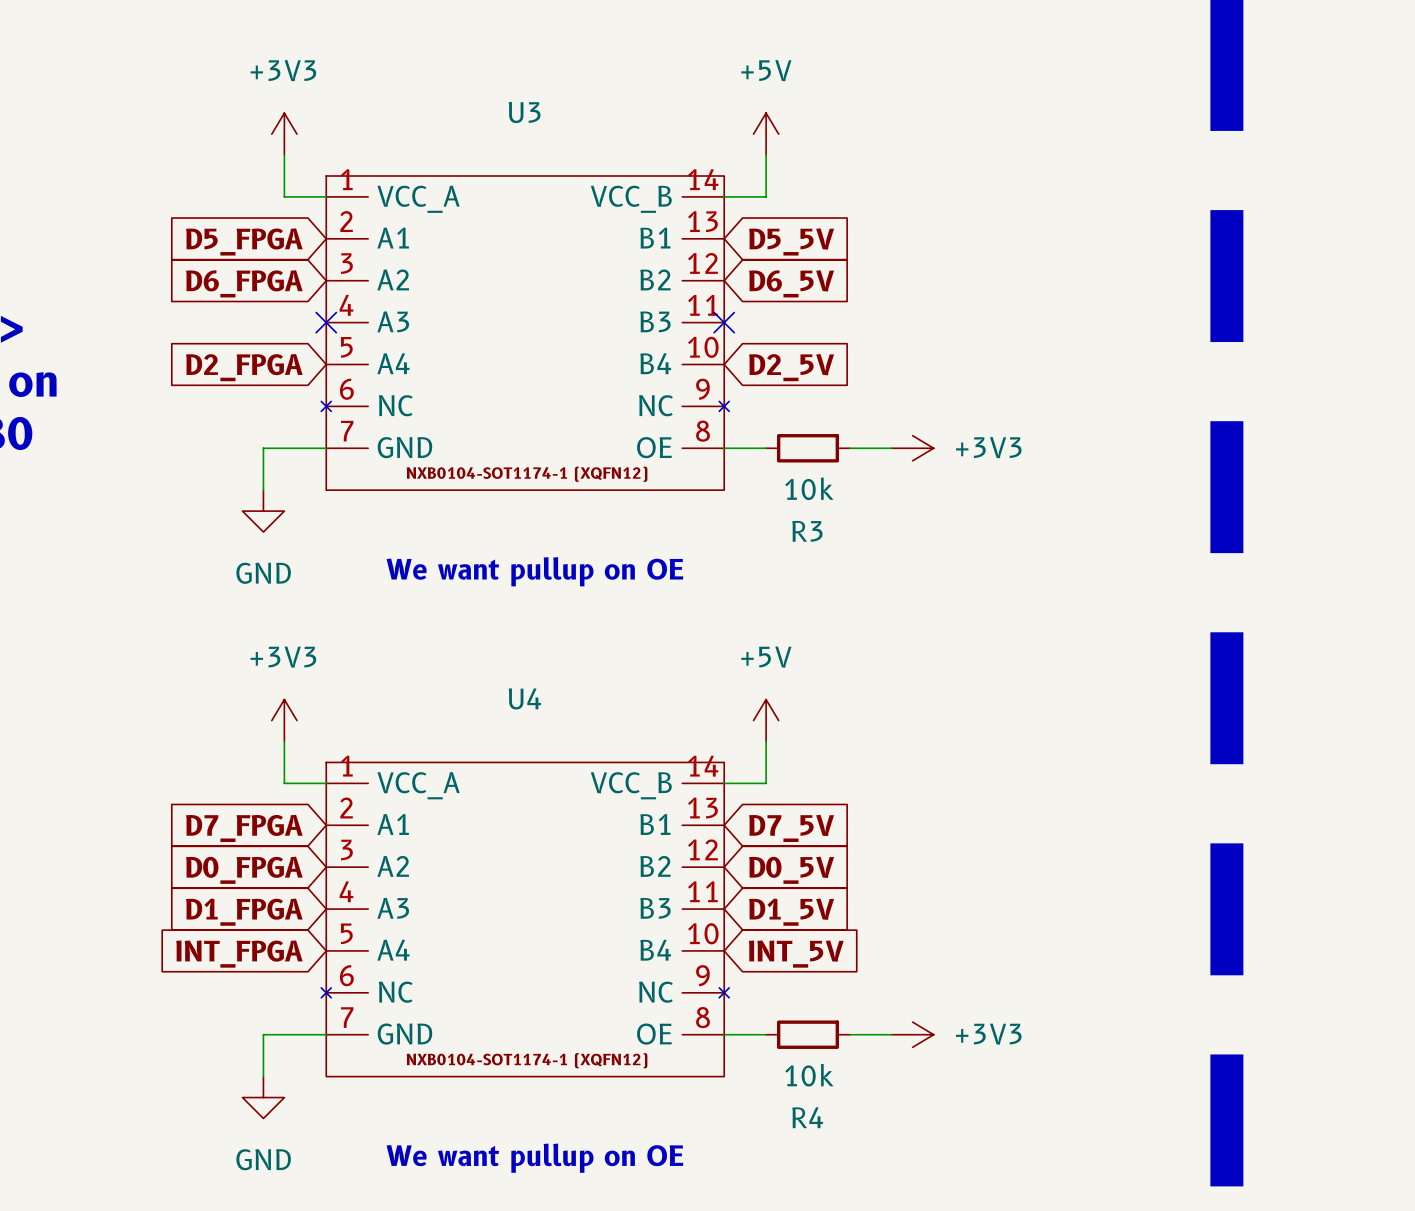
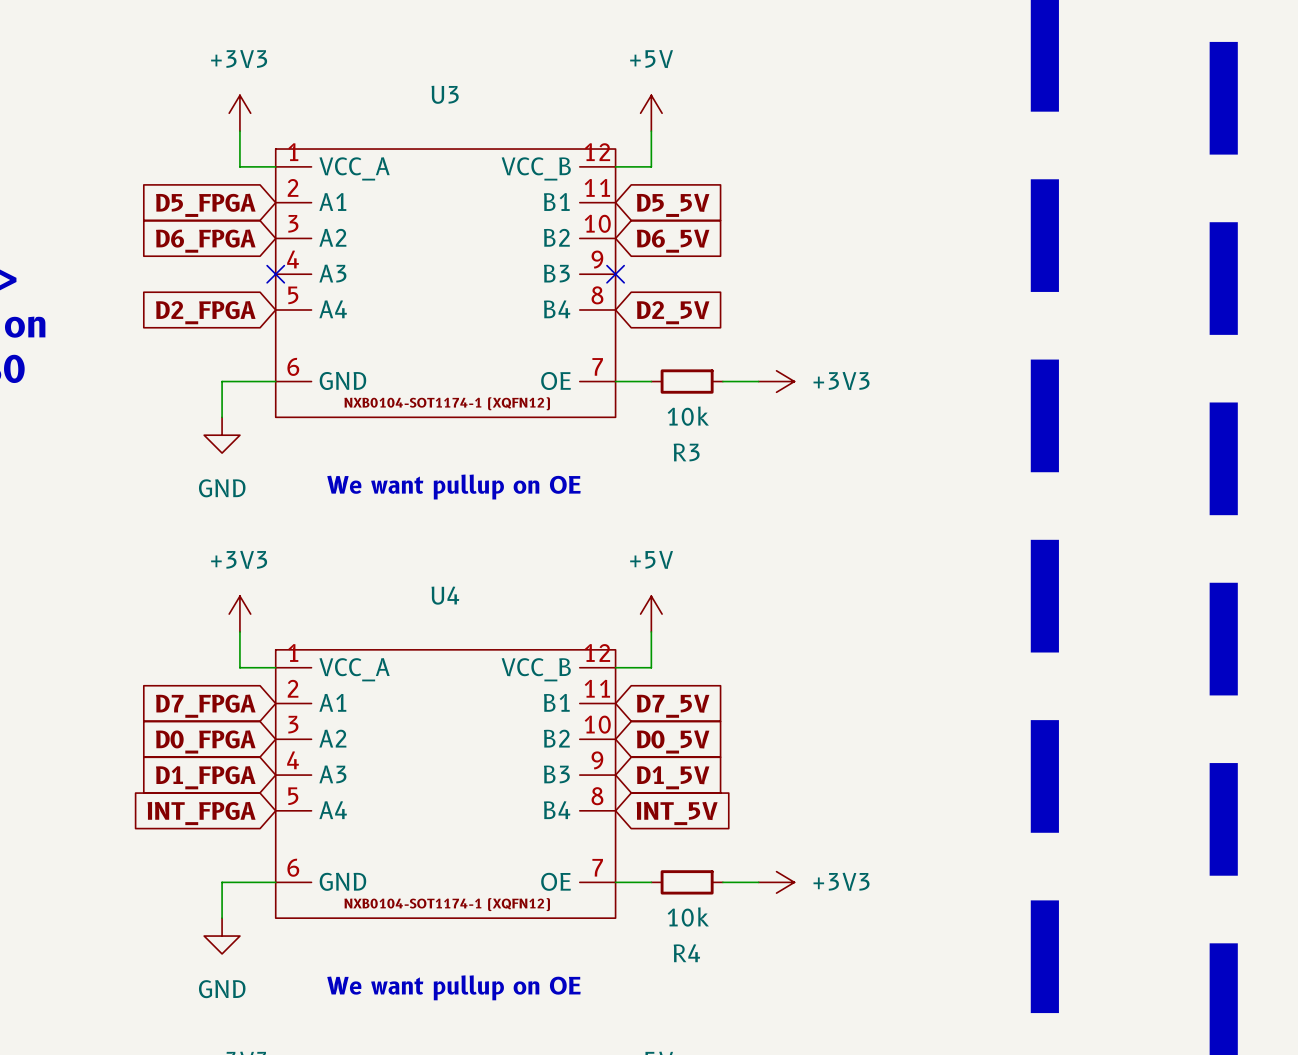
U3 symbol: [321, 175, 730, 491] -> [275, 149, 616, 418]
U4 symbol: [321, 762, 730, 1077] -> [275, 649, 616, 919]

